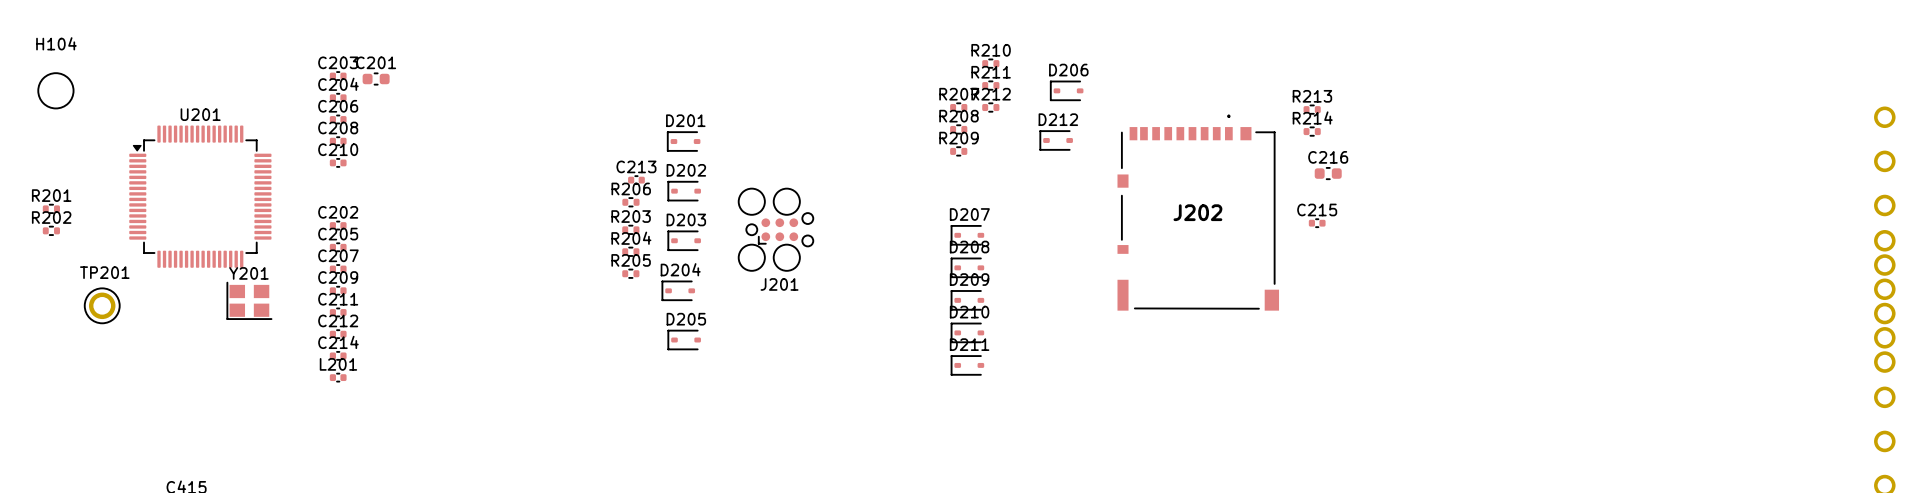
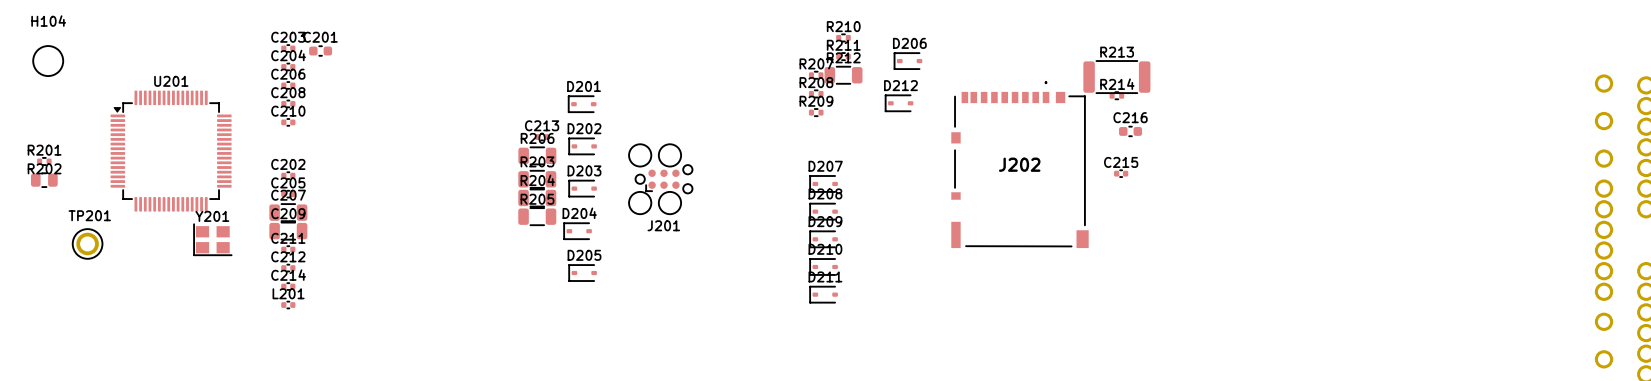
R212 footprint: [982, 102, 1000, 113] -> [824, 66, 863, 85]
R213 footprint: [1303, 104, 1321, 115] -> [1083, 60, 1151, 94]
R206 footprint: [622, 197, 640, 208] -> [518, 146, 557, 165]
R202 footprint: [42, 225, 60, 236] -> [30, 172, 58, 188]
R203 footprint: [622, 225, 640, 235] -> [518, 170, 557, 189]
R204 footprint: [622, 246, 640, 257] -> [518, 188, 557, 208]
C207 footprint: [329, 264, 347, 274] -> [269, 203, 308, 222]
R205 footprint: [622, 268, 640, 279] -> [518, 207, 557, 226]
C209 footprint: [329, 286, 347, 296] -> [269, 222, 308, 241]

